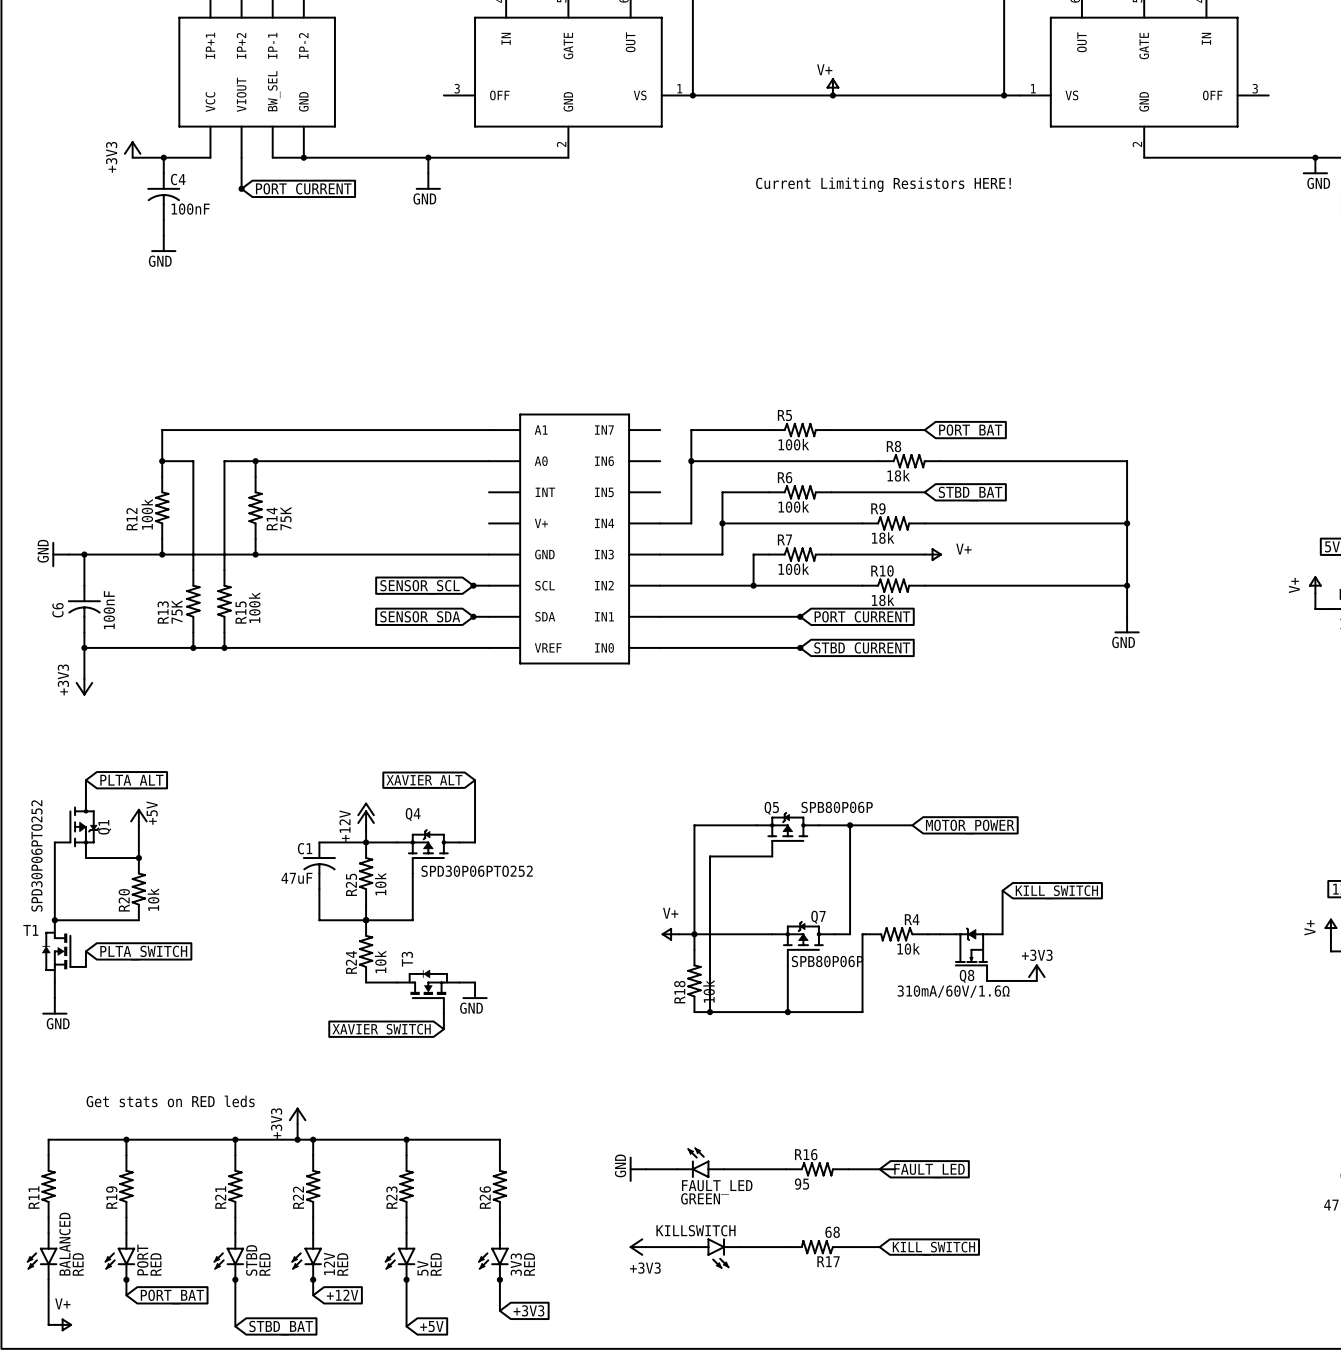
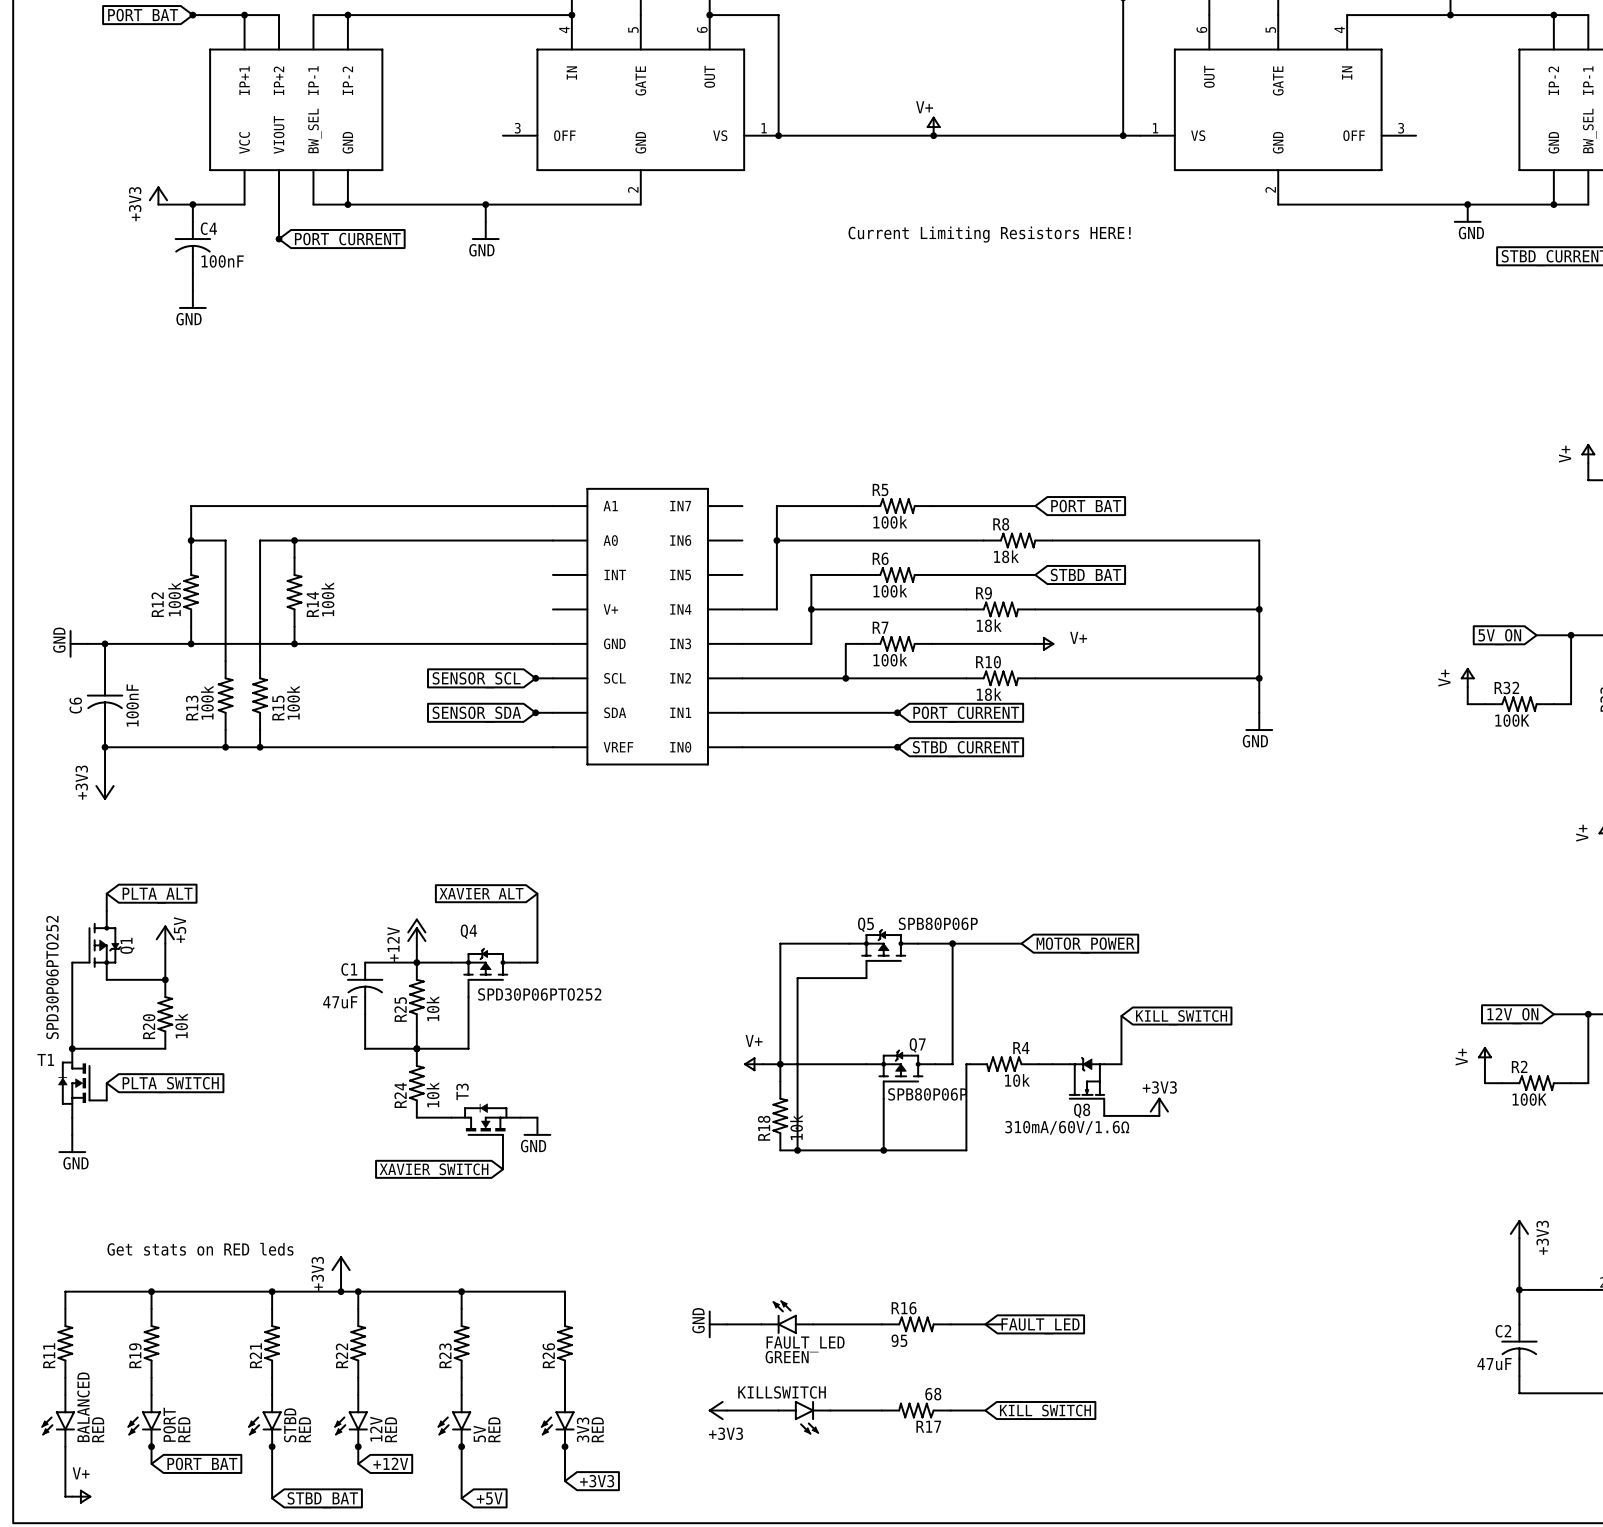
R14 value: 75K (286, 518) -> 100k (327, 599)
R13 value: 75K (177, 612) -> 100k (207, 702)

